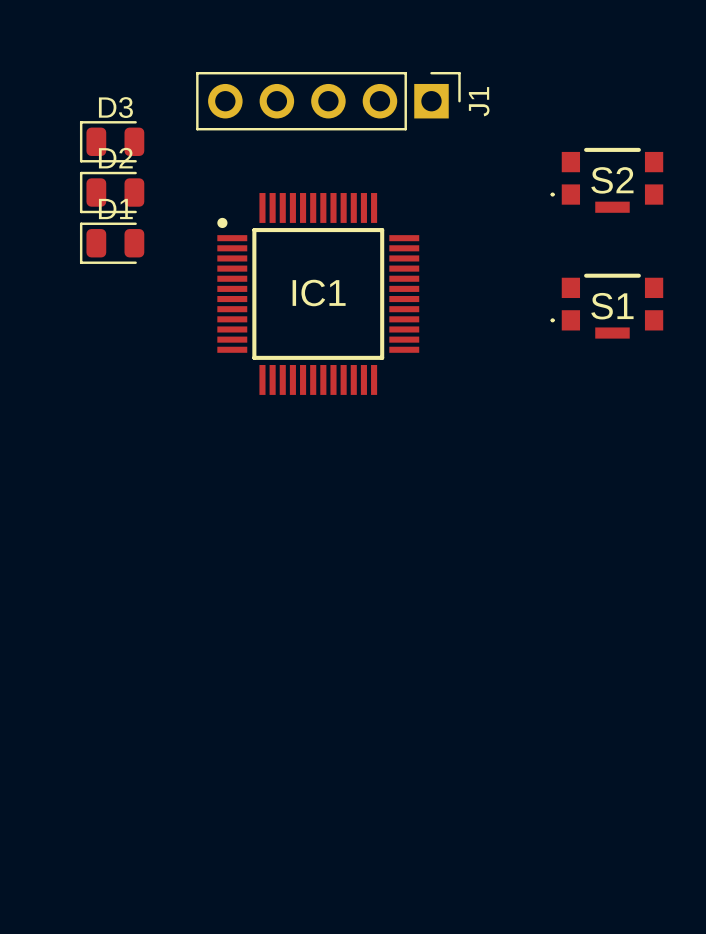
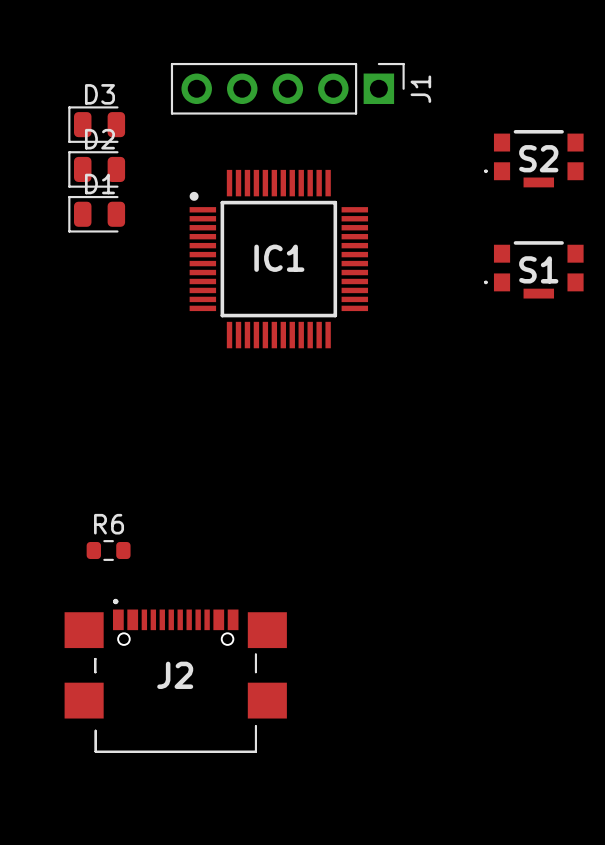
R6: none -> (108, 550)
J2: none -> (175, 675)

